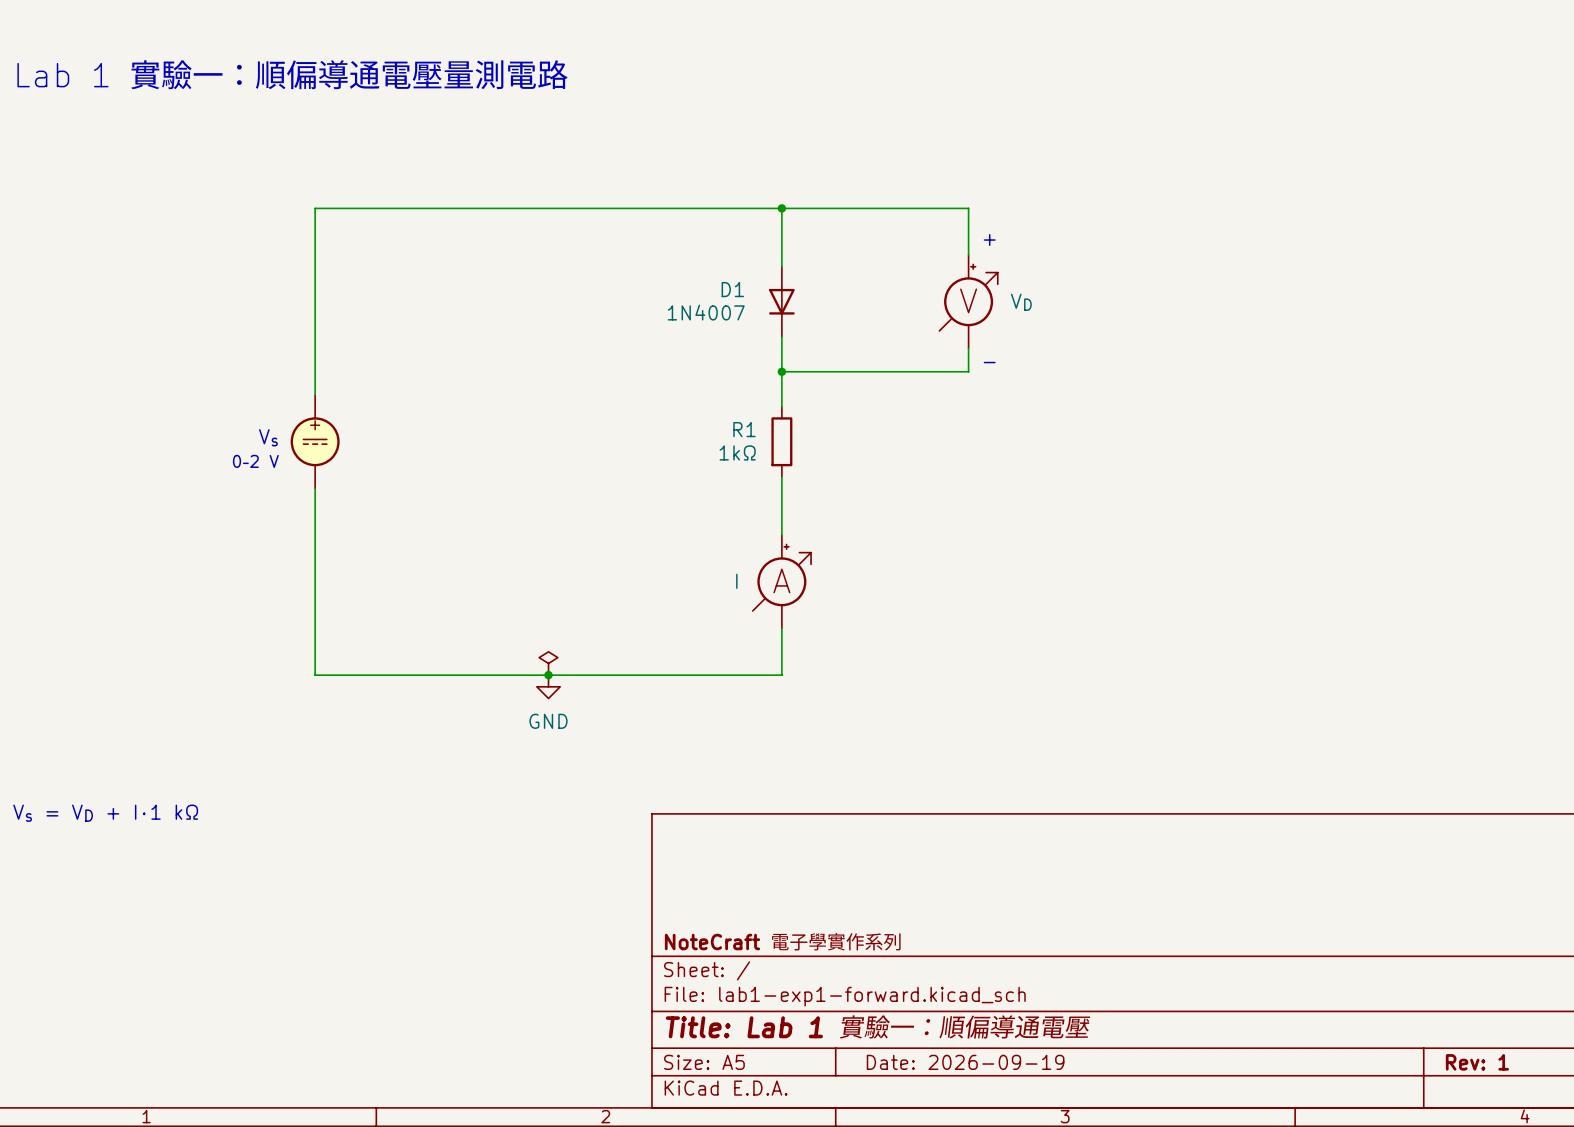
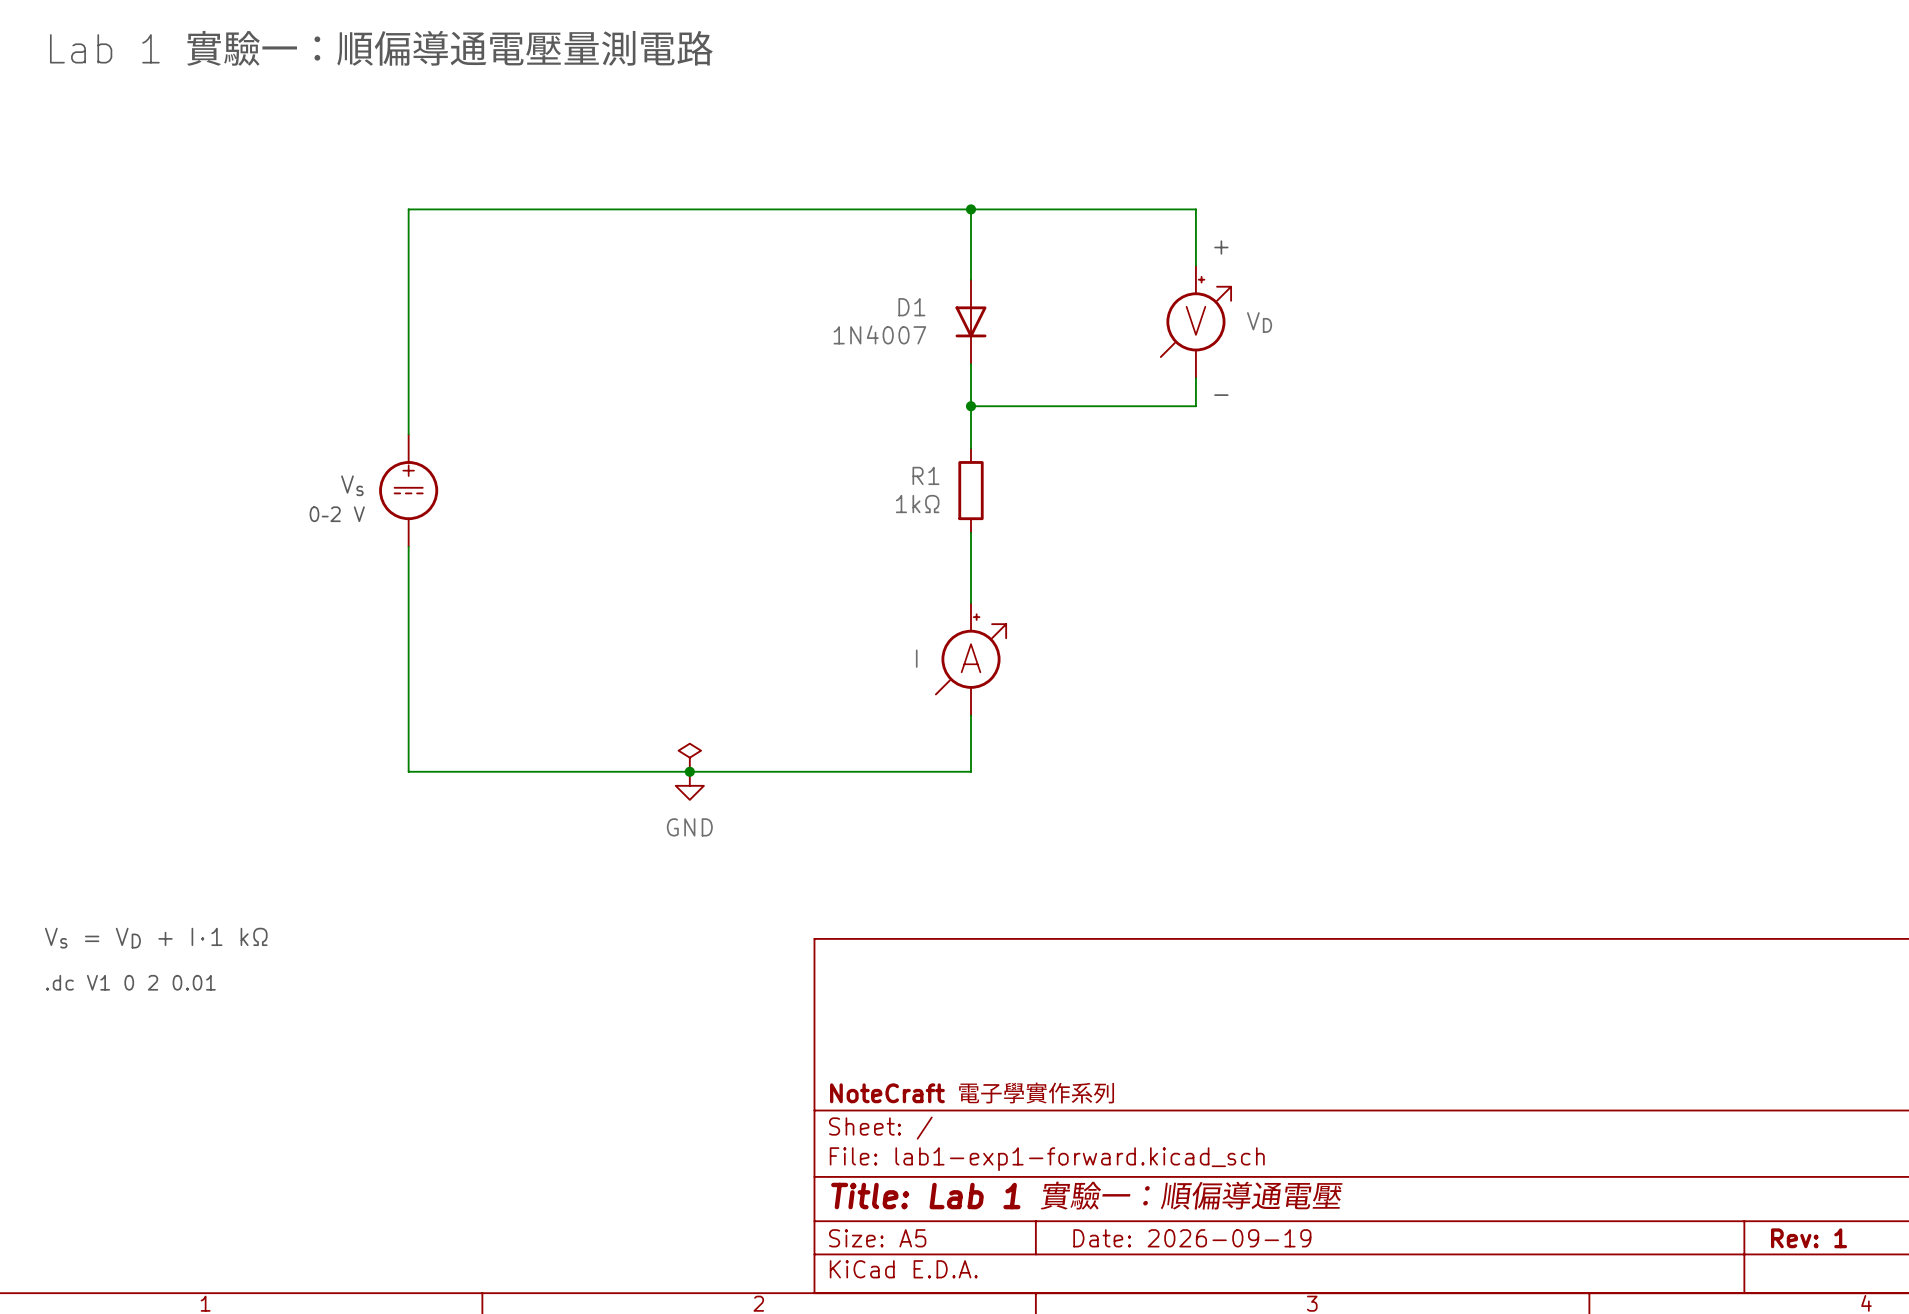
text: none -> .dc V1 0 2 0.01 (130, 982)

